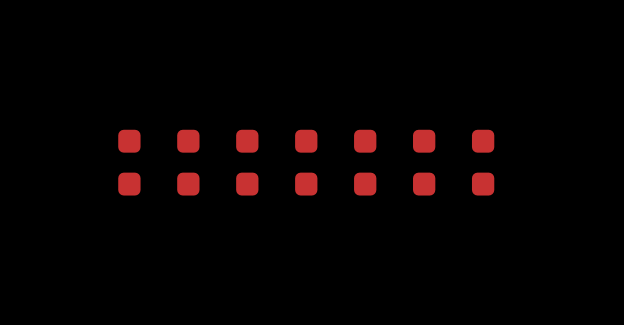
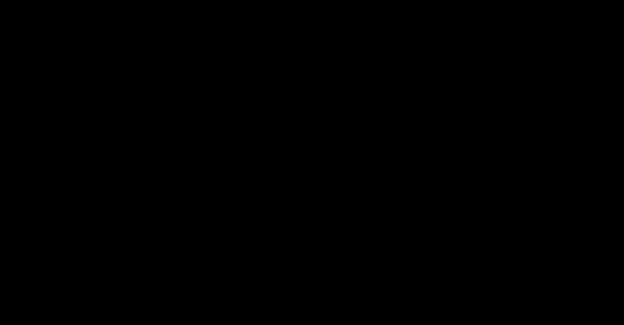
part: (129, 162) -> none
part: (188, 162) -> none
part: (247, 162) -> none
part: (306, 162) -> none
part: (365, 162) -> none
part: (424, 162) -> none
part: (483, 162) -> none

